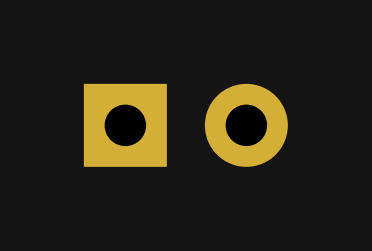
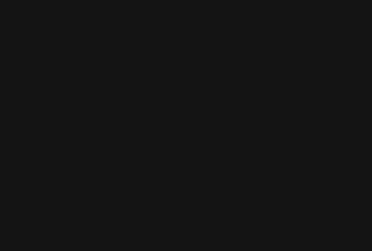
part: (185, 125) -> none

